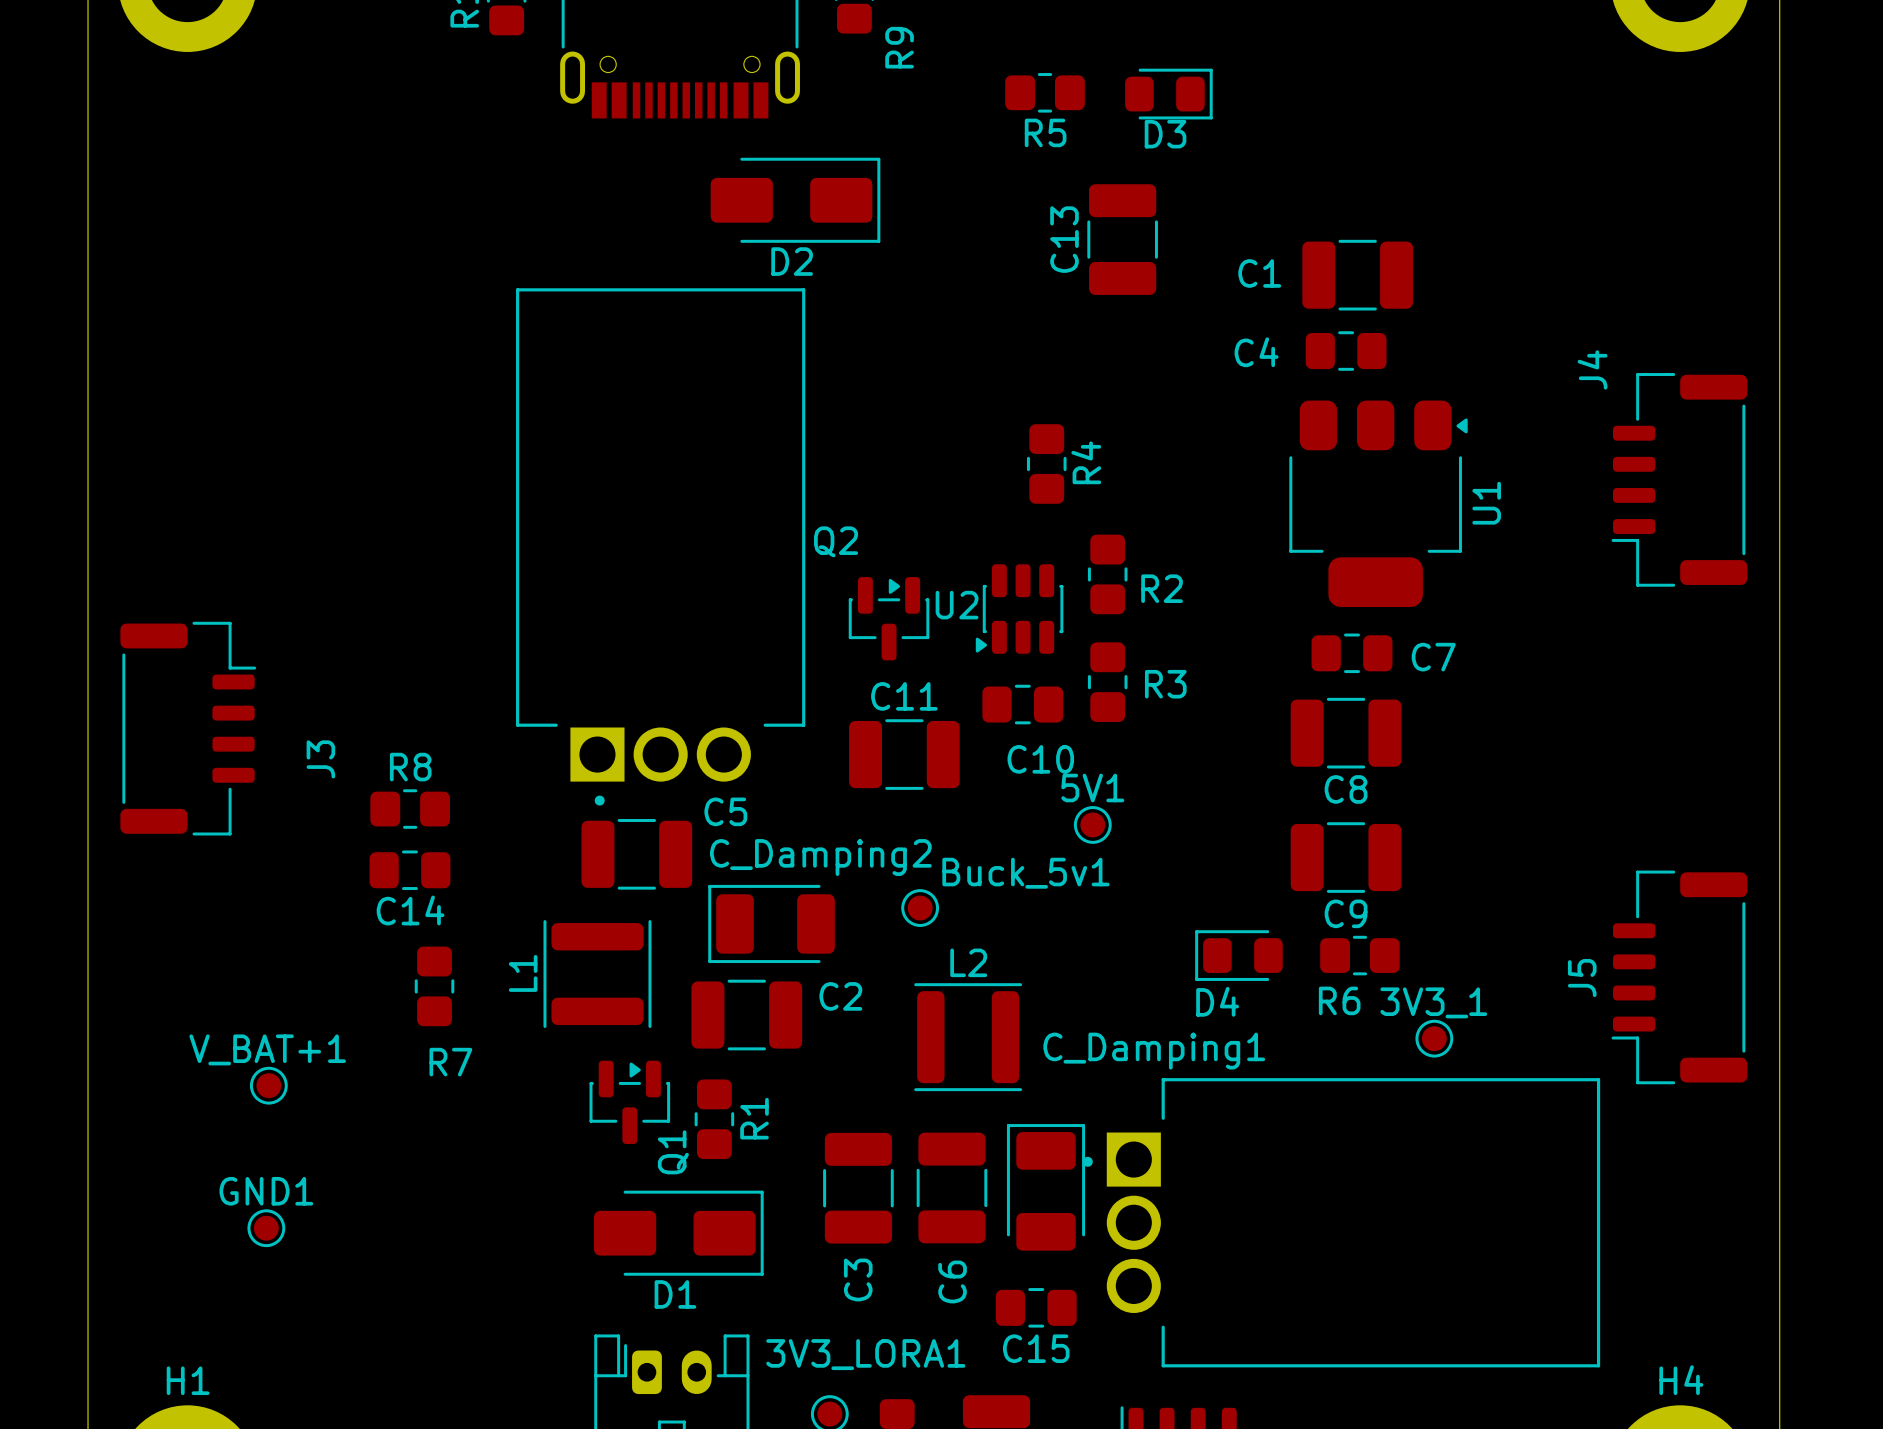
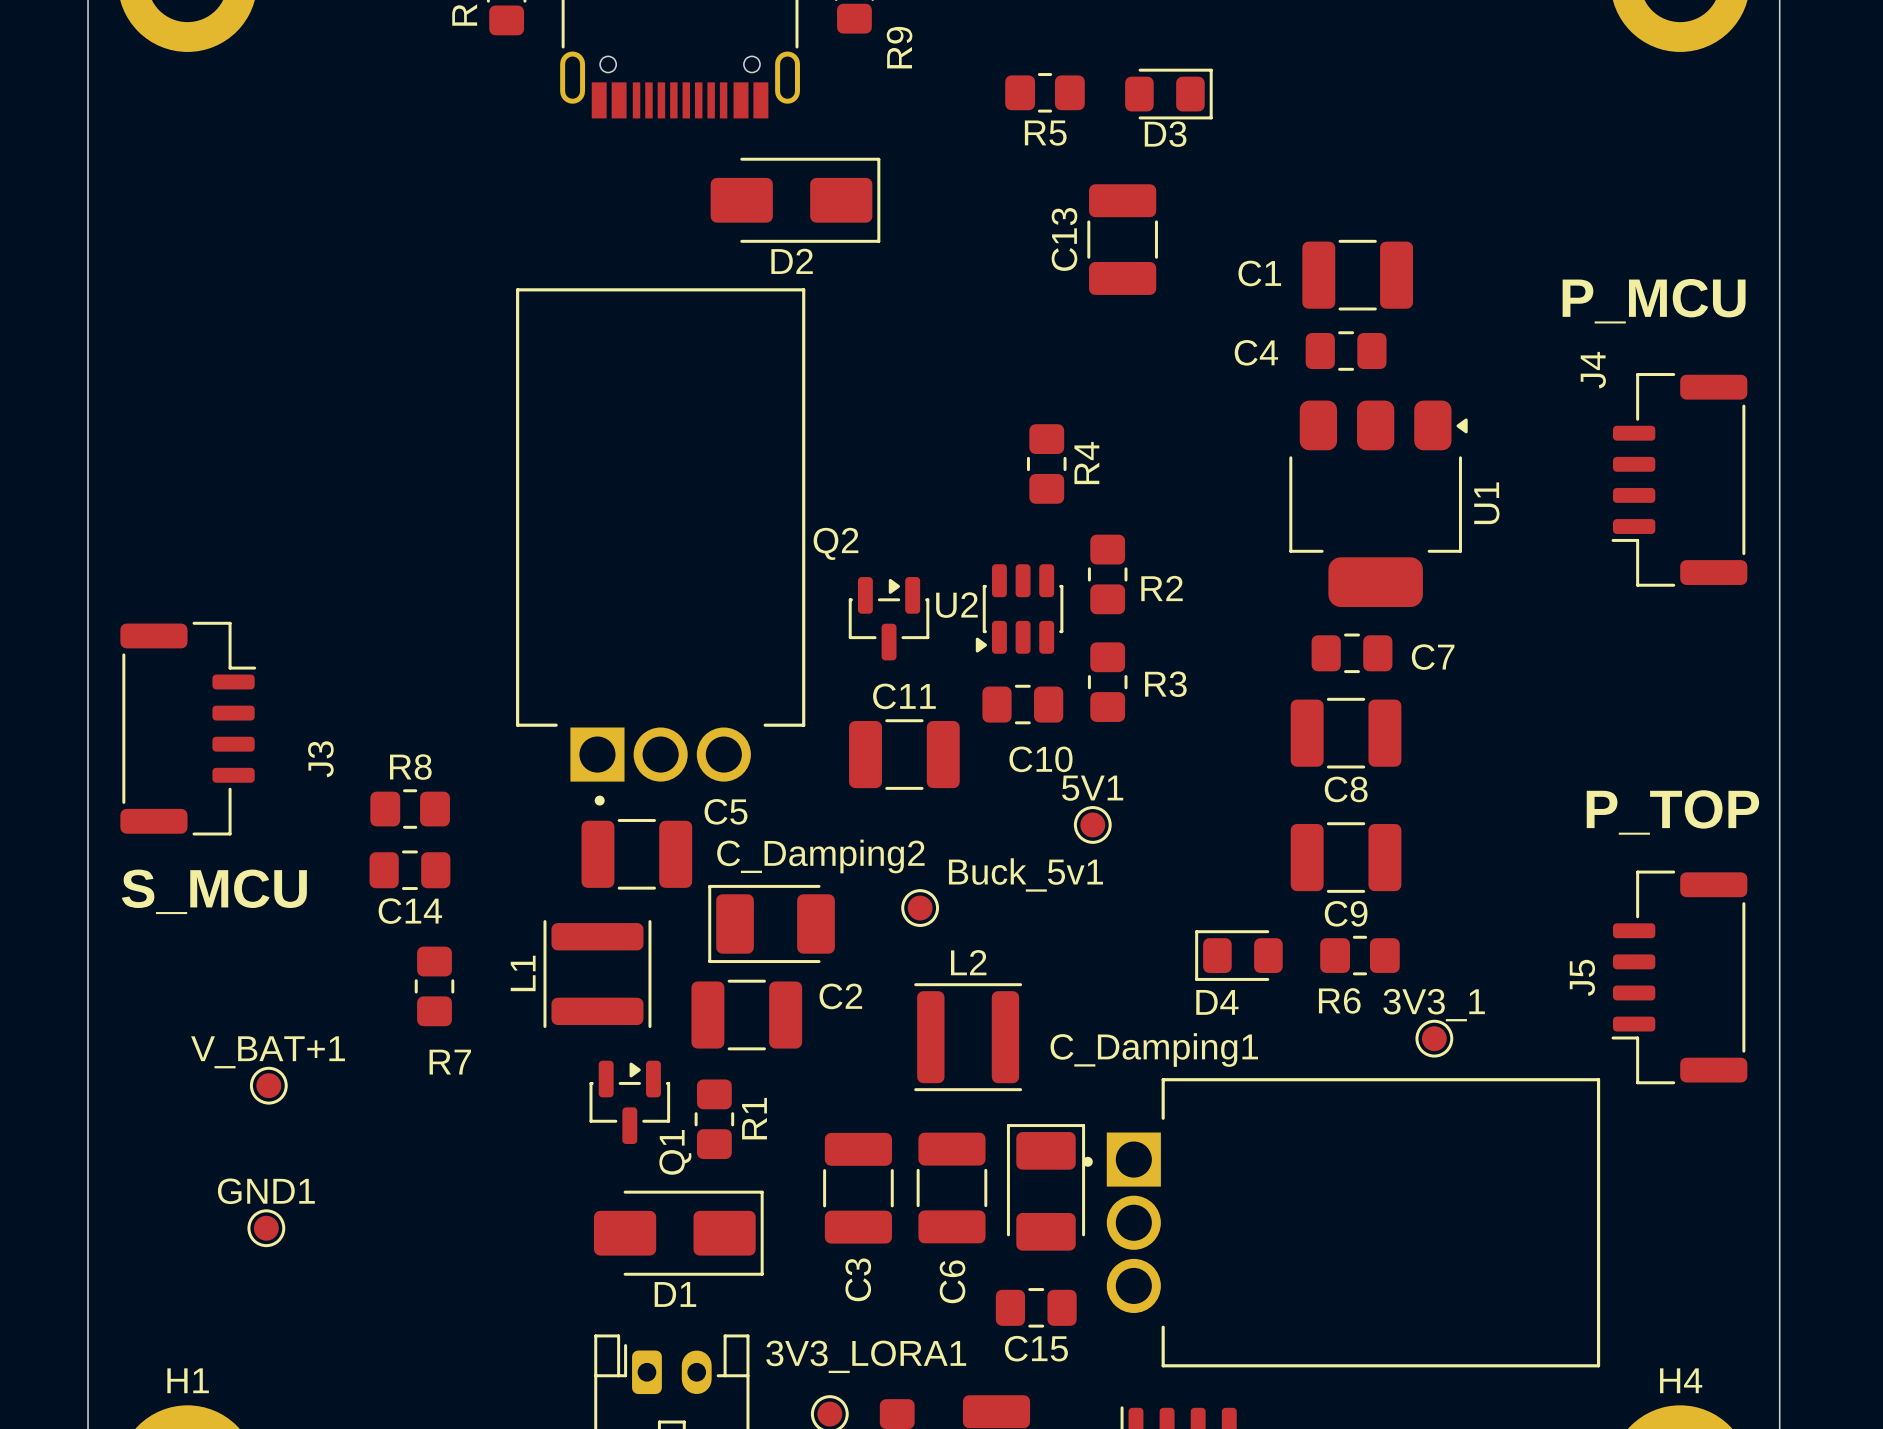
text: none -> P_MCU (1654, 301)
text: none -> P_TOP (1672, 812)
text: none -> S_MCU (214, 891)

